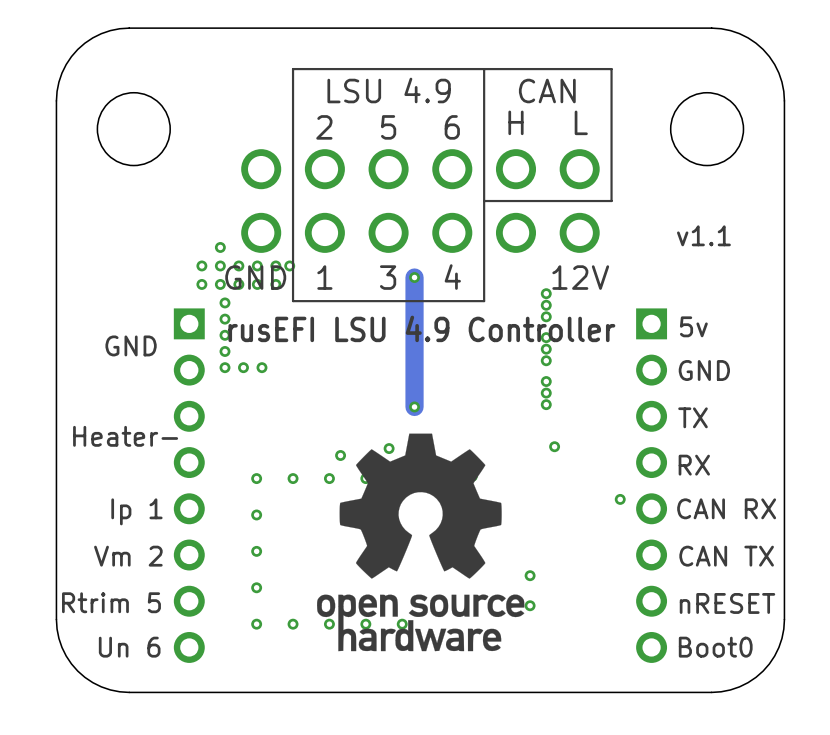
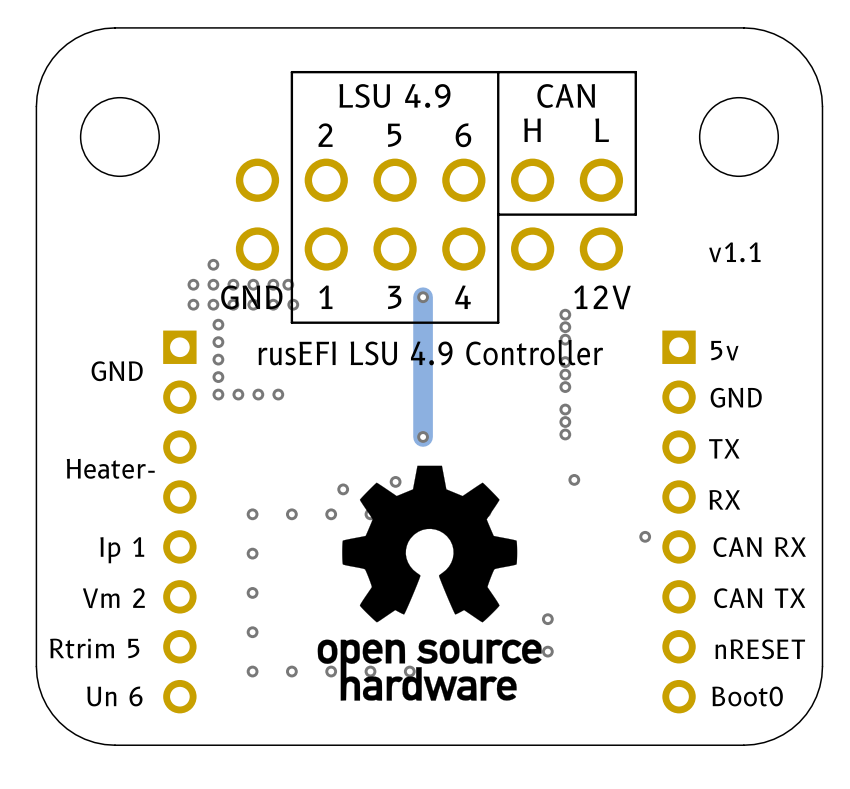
via: none -> (293, 304)
via: none -> (278, 394)

